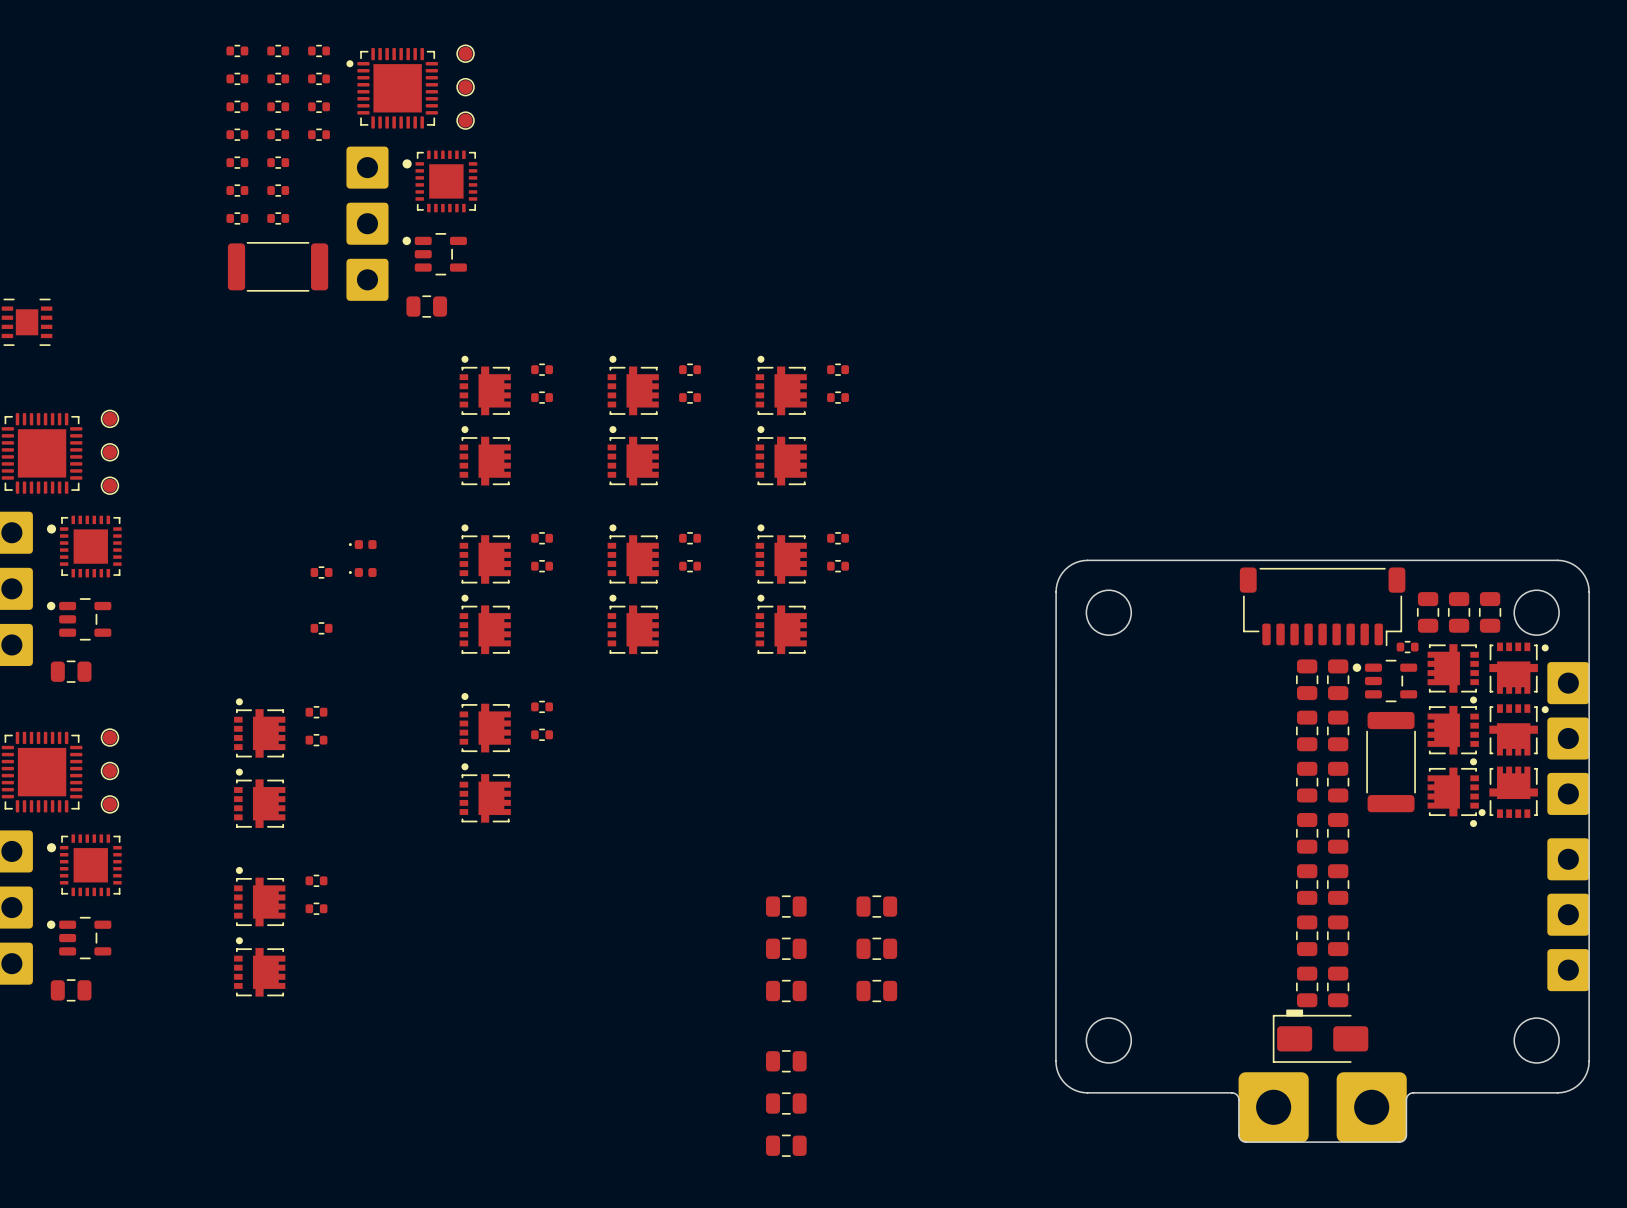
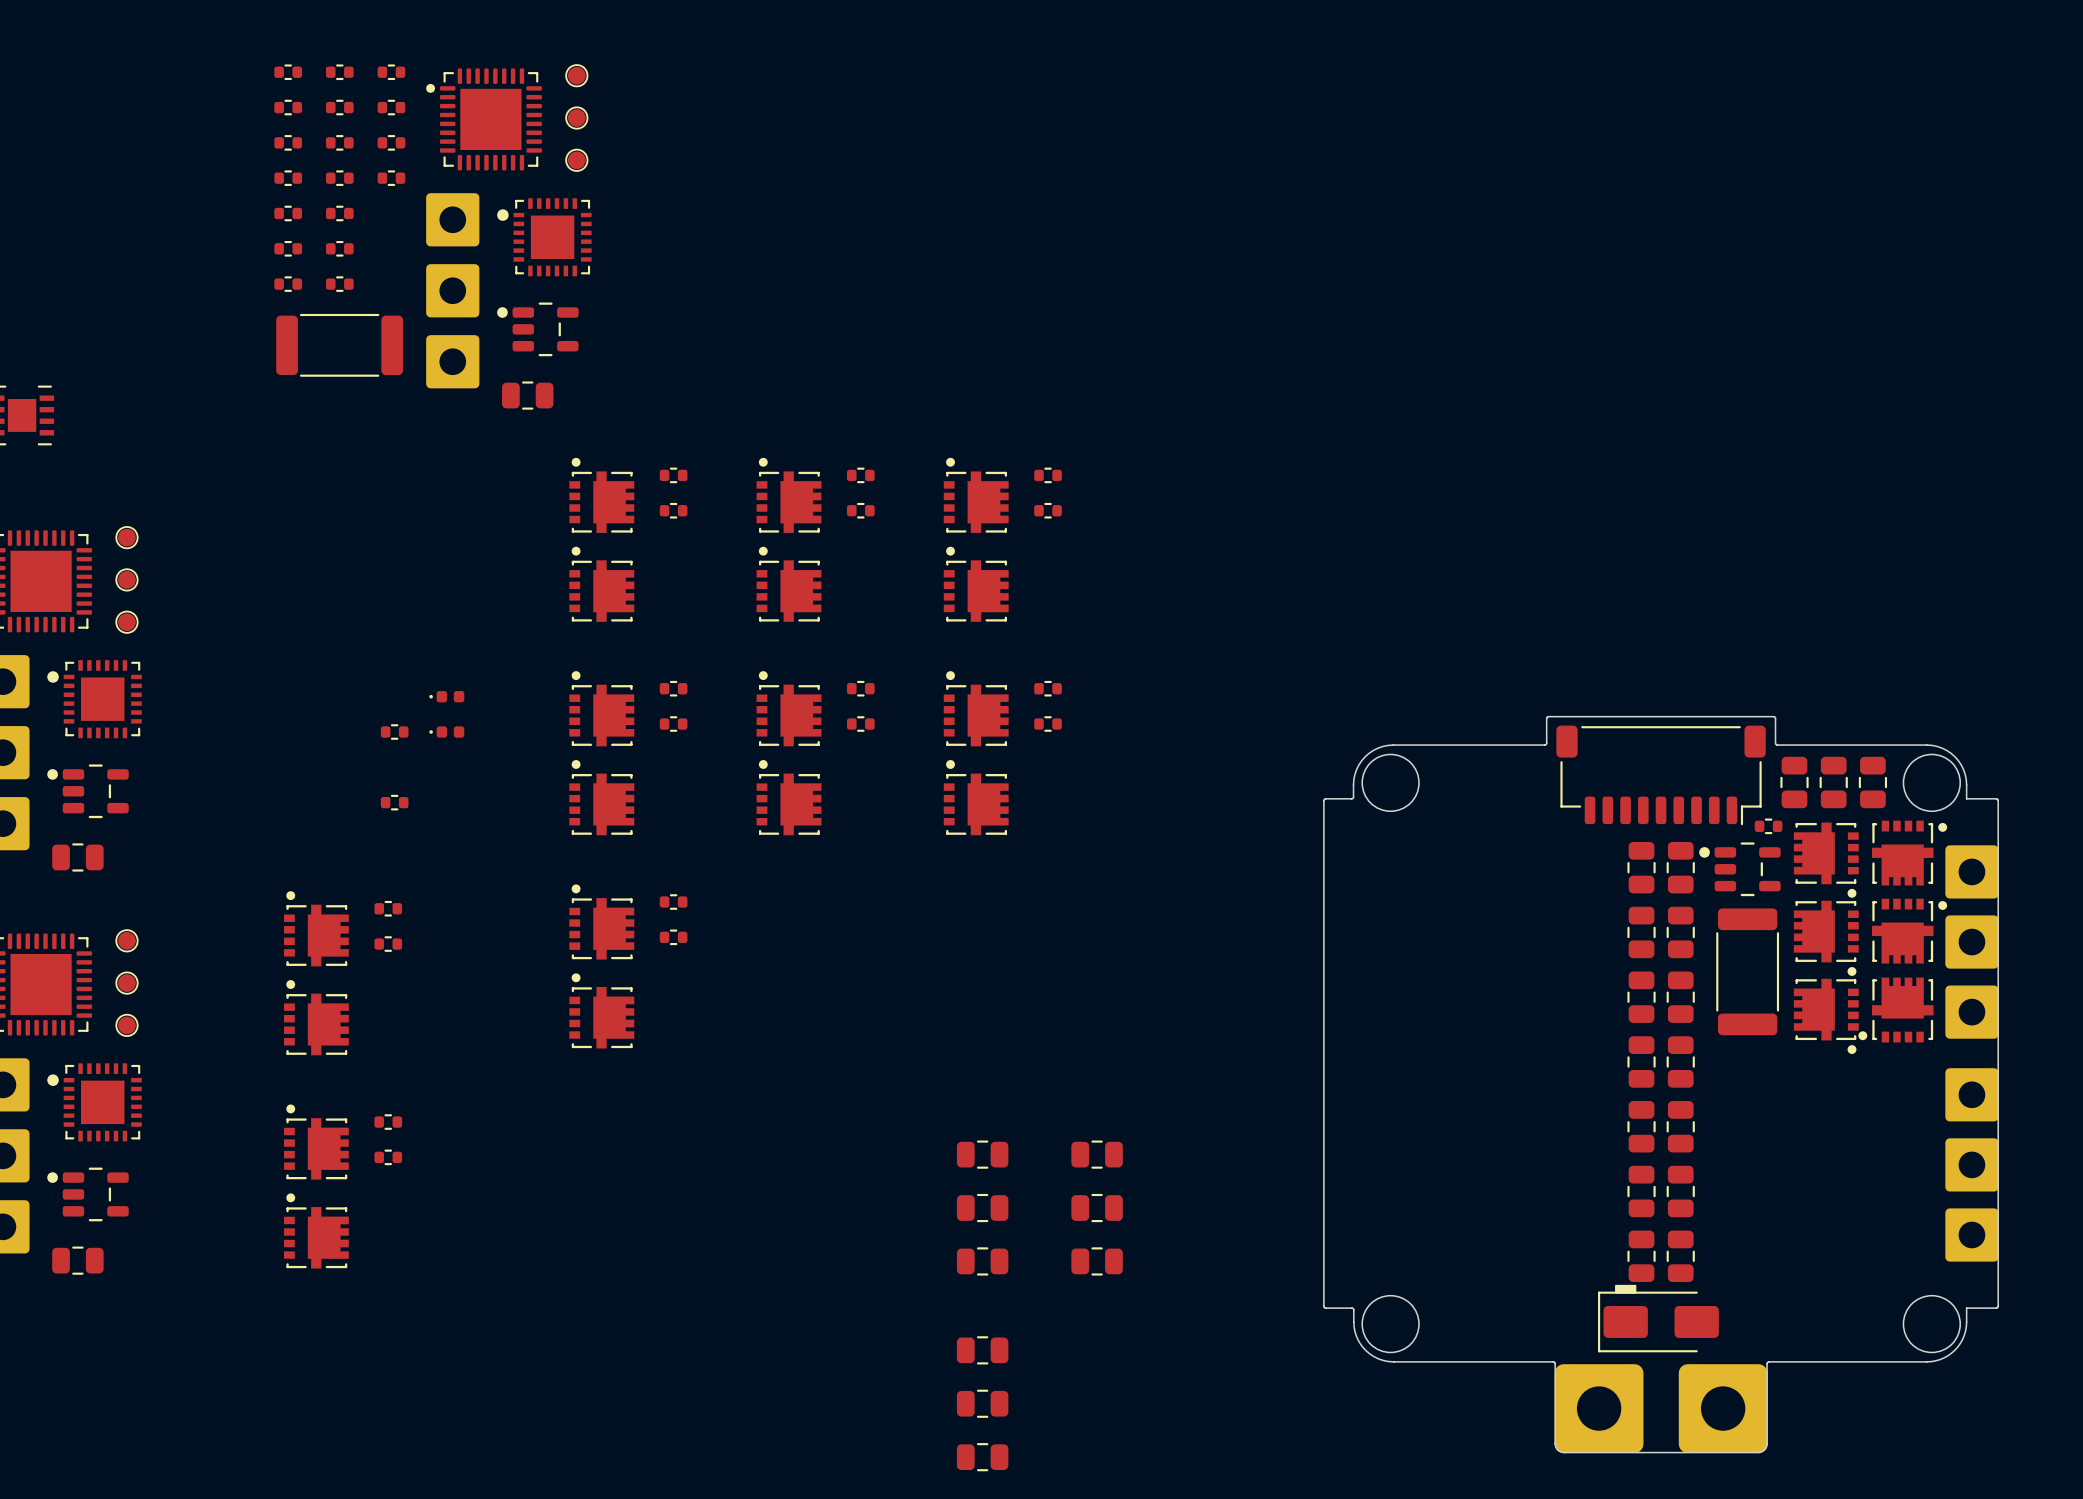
board edge: (1233, 560) (1083, 560) (1068, 566) (1058, 579) (1056, 591) (1055, 1061) (1057, 1071) (1062, 1080) (1070, 1088) (1080, 1092) (1231, 1092) (1236, 1094) (1238, 1099) -> (1548, 716) (1546, 718) (1545, 745) (1393, 745) (1378, 748) (1365, 756) (1358, 765) (1353, 779) (1352, 798) (1324, 799) (1323, 1306) (1325, 1308) (1353, 1308) (1354, 1327) (1359, 1341) (1369, 1353) (1383, 1360) (1554, 1361) (1555, 1399)
board edge: (1411, 560) (1557, 560) (1569, 562) (1579, 569) (1588, 583) (1589, 626) -> (1773, 716) (1775, 718) (1776, 745) (1926, 745) (1941, 748) (1954, 756) (1963, 769) (1966, 779) (1966, 798) (1996, 798) (1998, 800)
board edge: (1589, 1026) (1588, 1069) (1582, 1080) (1569, 1090) (1557, 1092) (1413, 1092) (1408, 1094) (1406, 1099) -> (1998, 1306) (1996, 1308) (1966, 1308) (1965, 1330) (1960, 1343) (1951, 1353) (1935, 1360) (1768, 1361) (1767, 1399)

